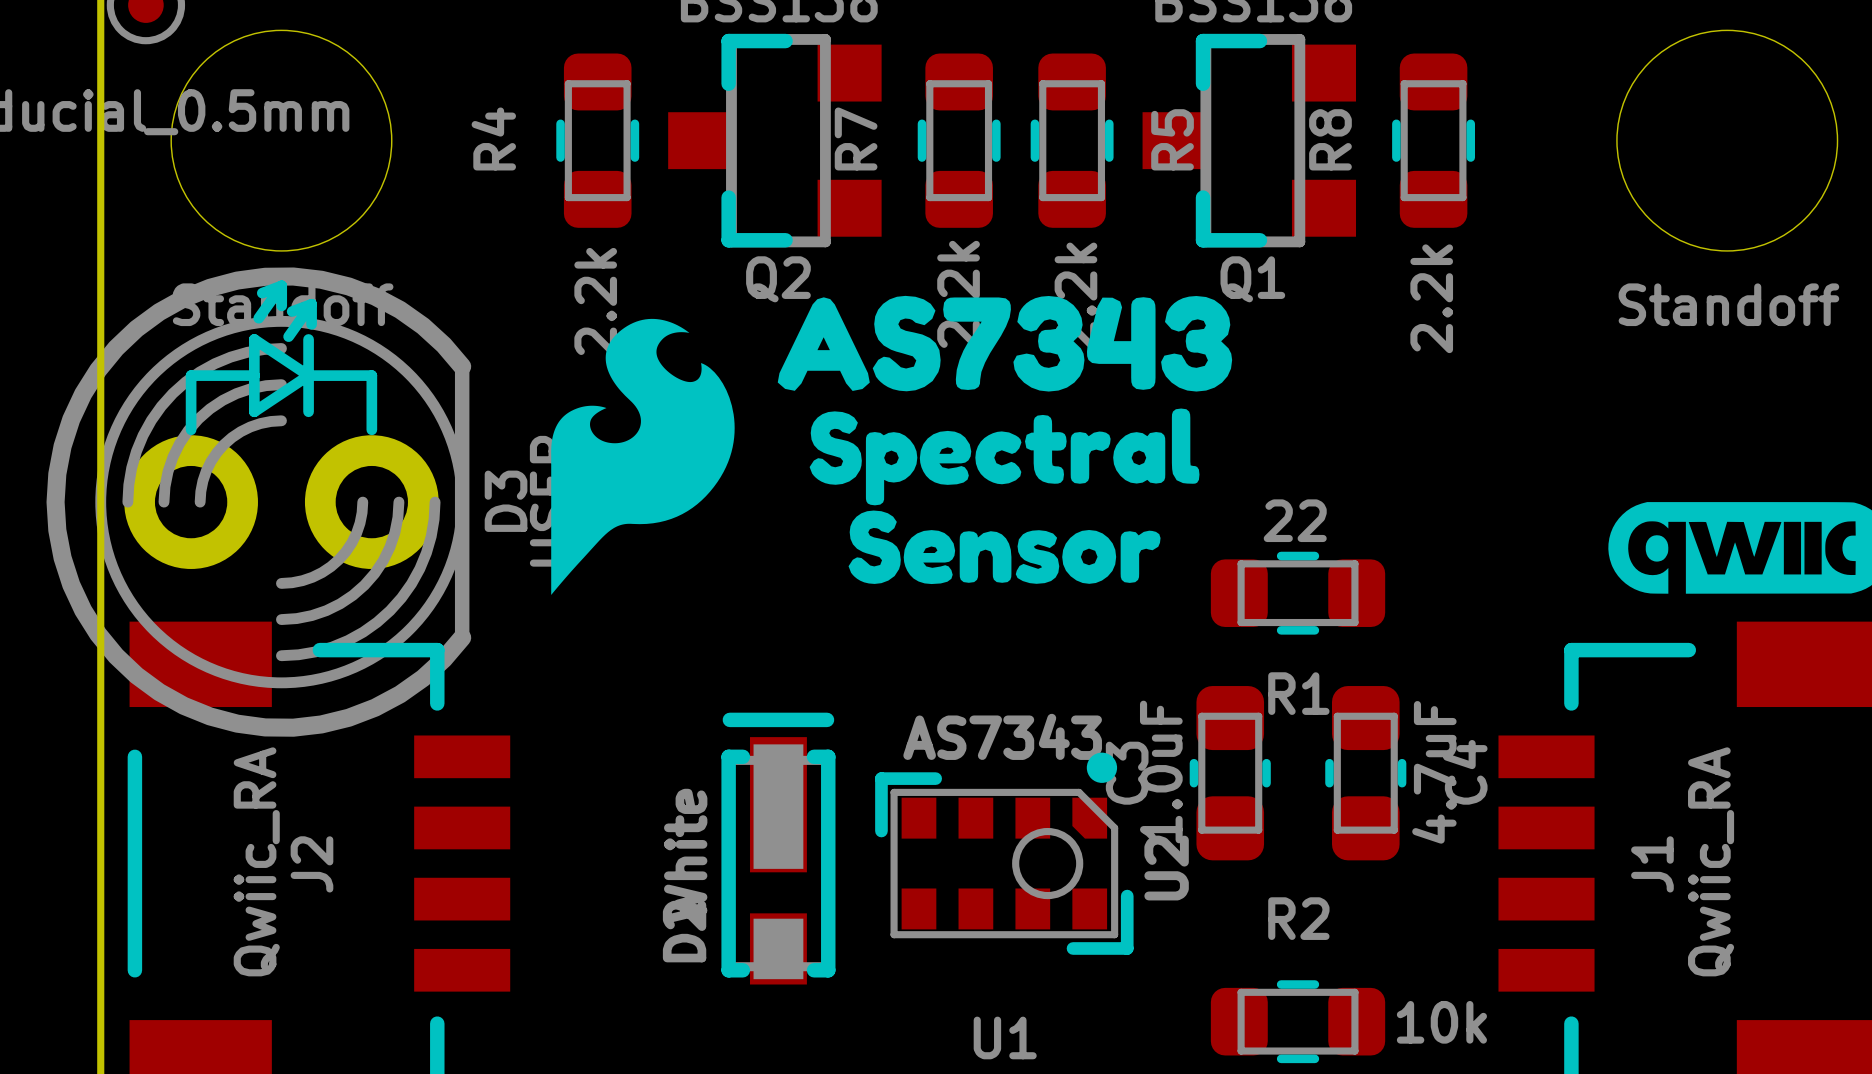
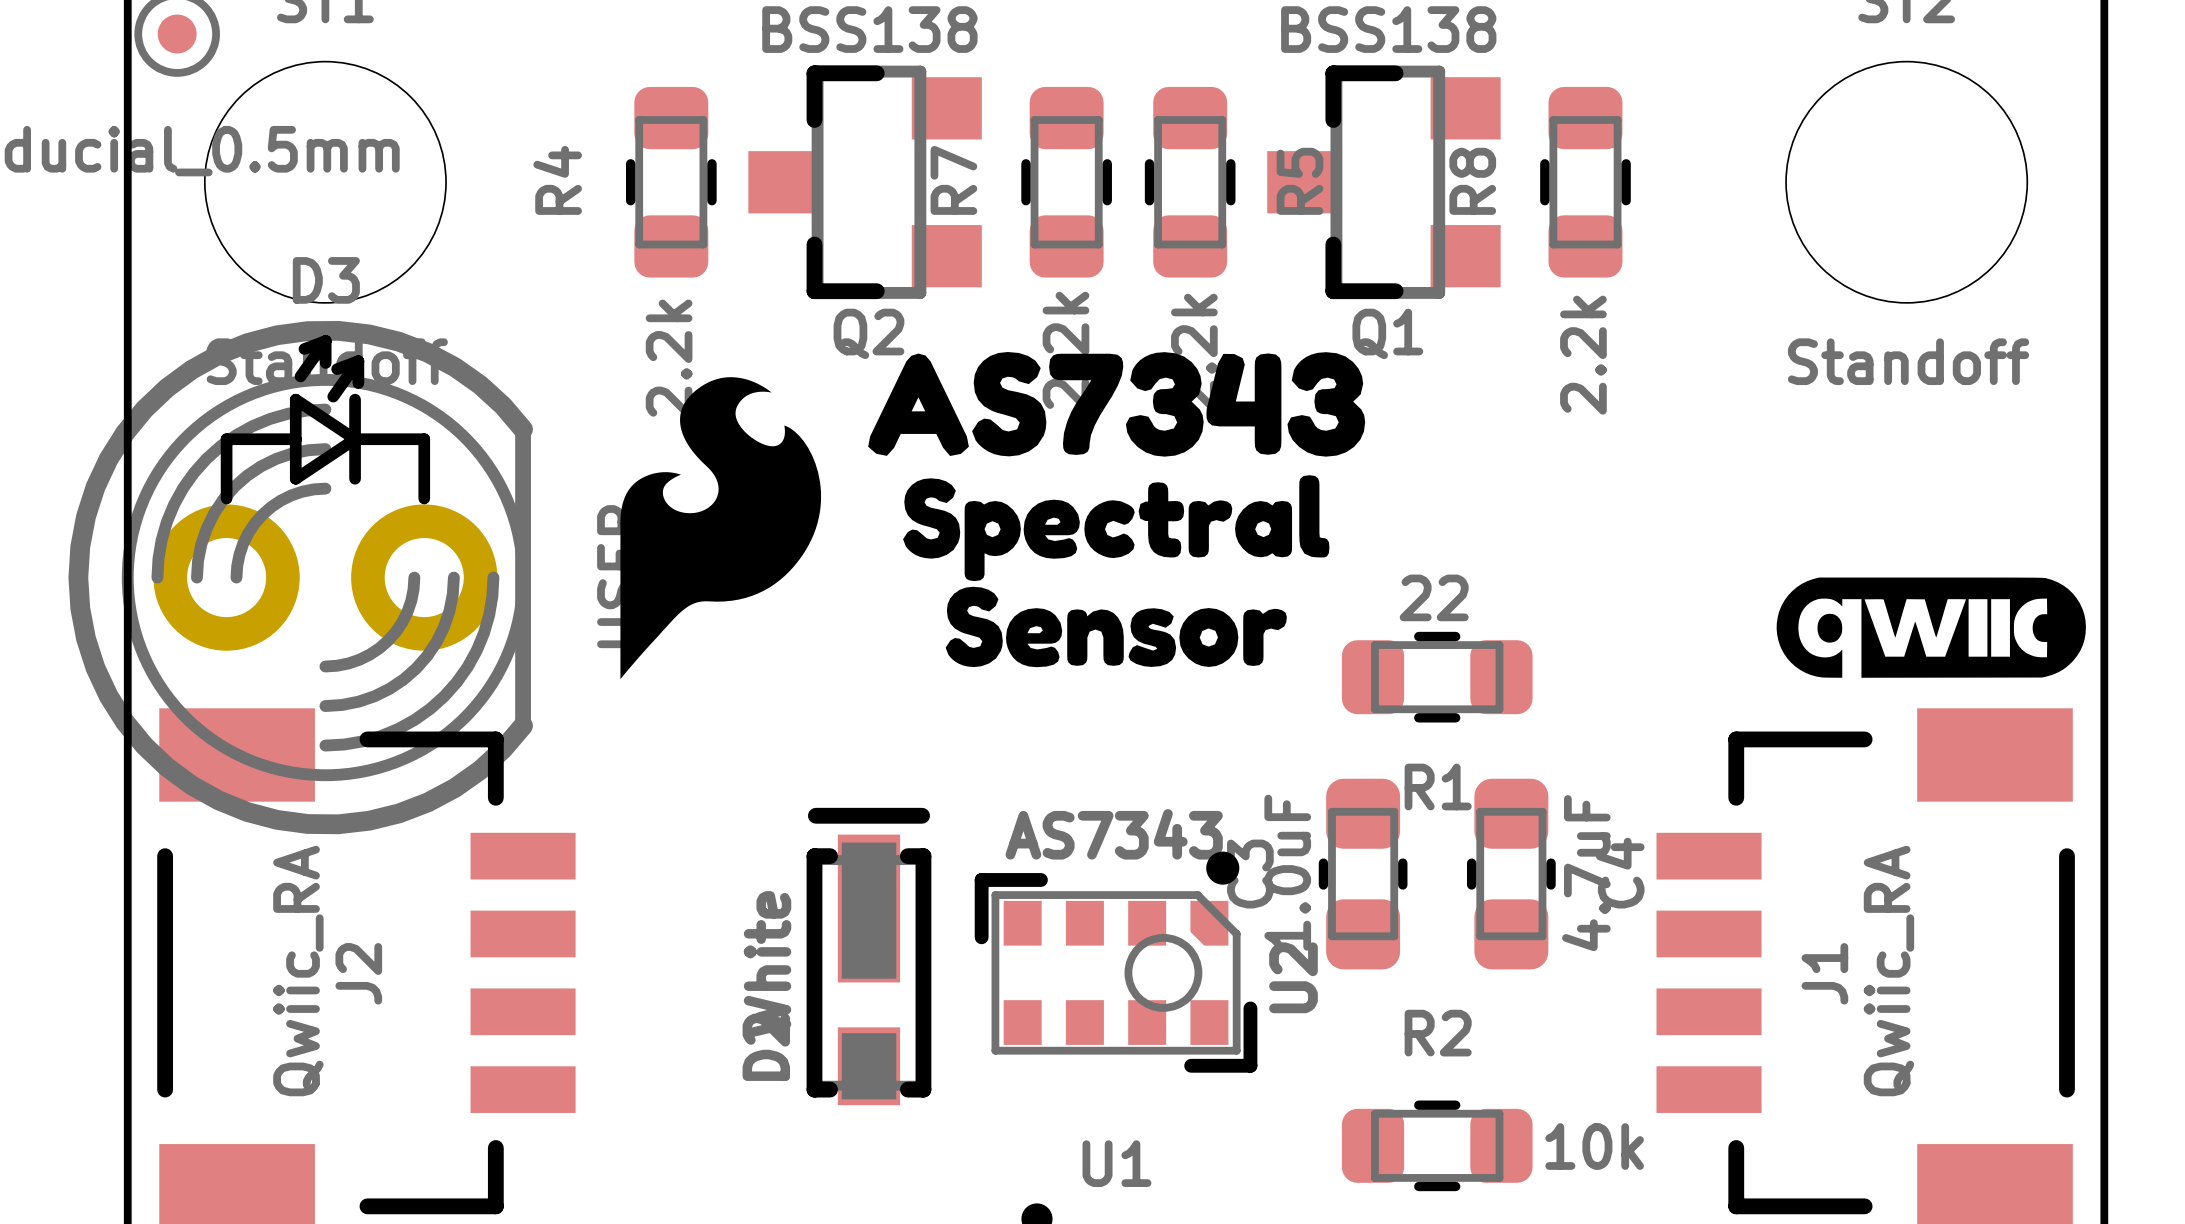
D3 name rotation: 0° (506, 501) -> 90° clockwise (326, 280)
D3 name position: D3 (506, 501) -> D3 (326, 280)

